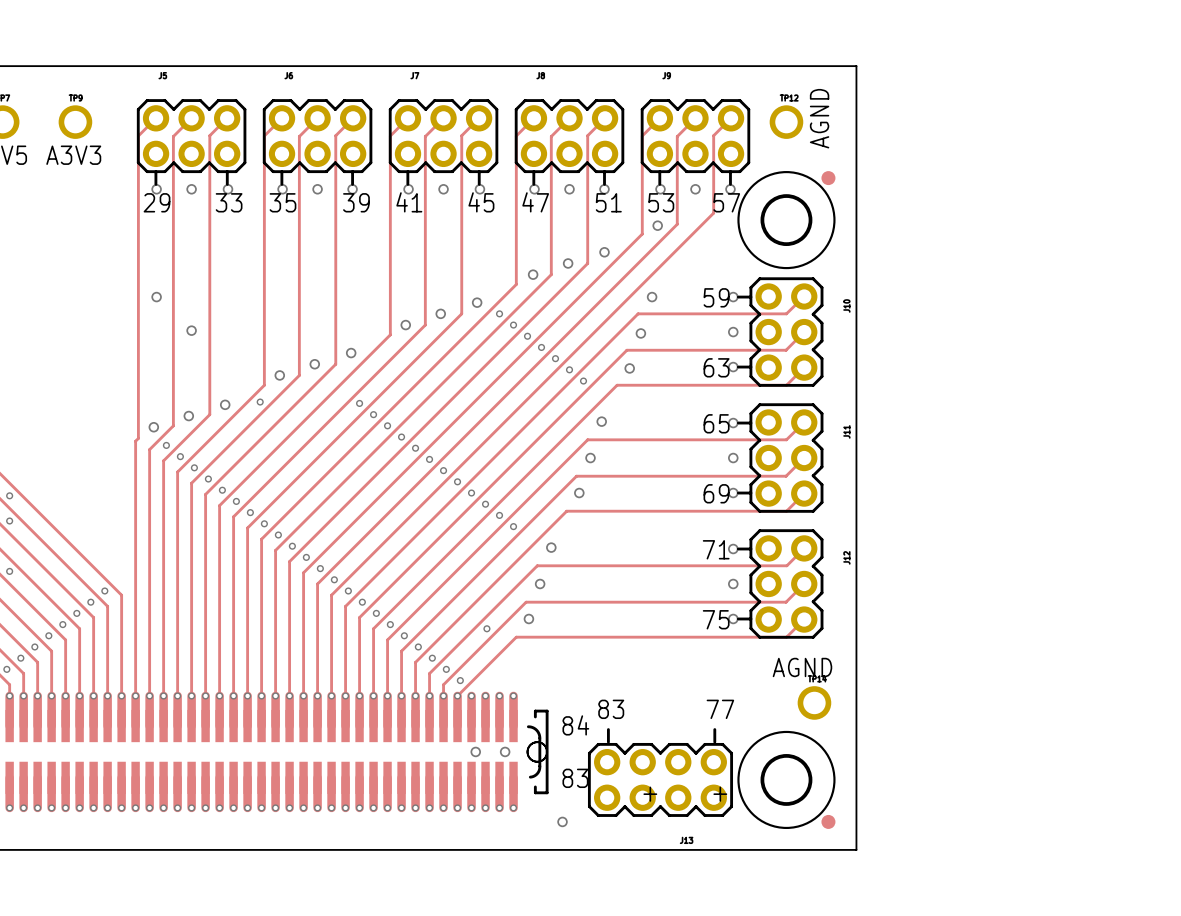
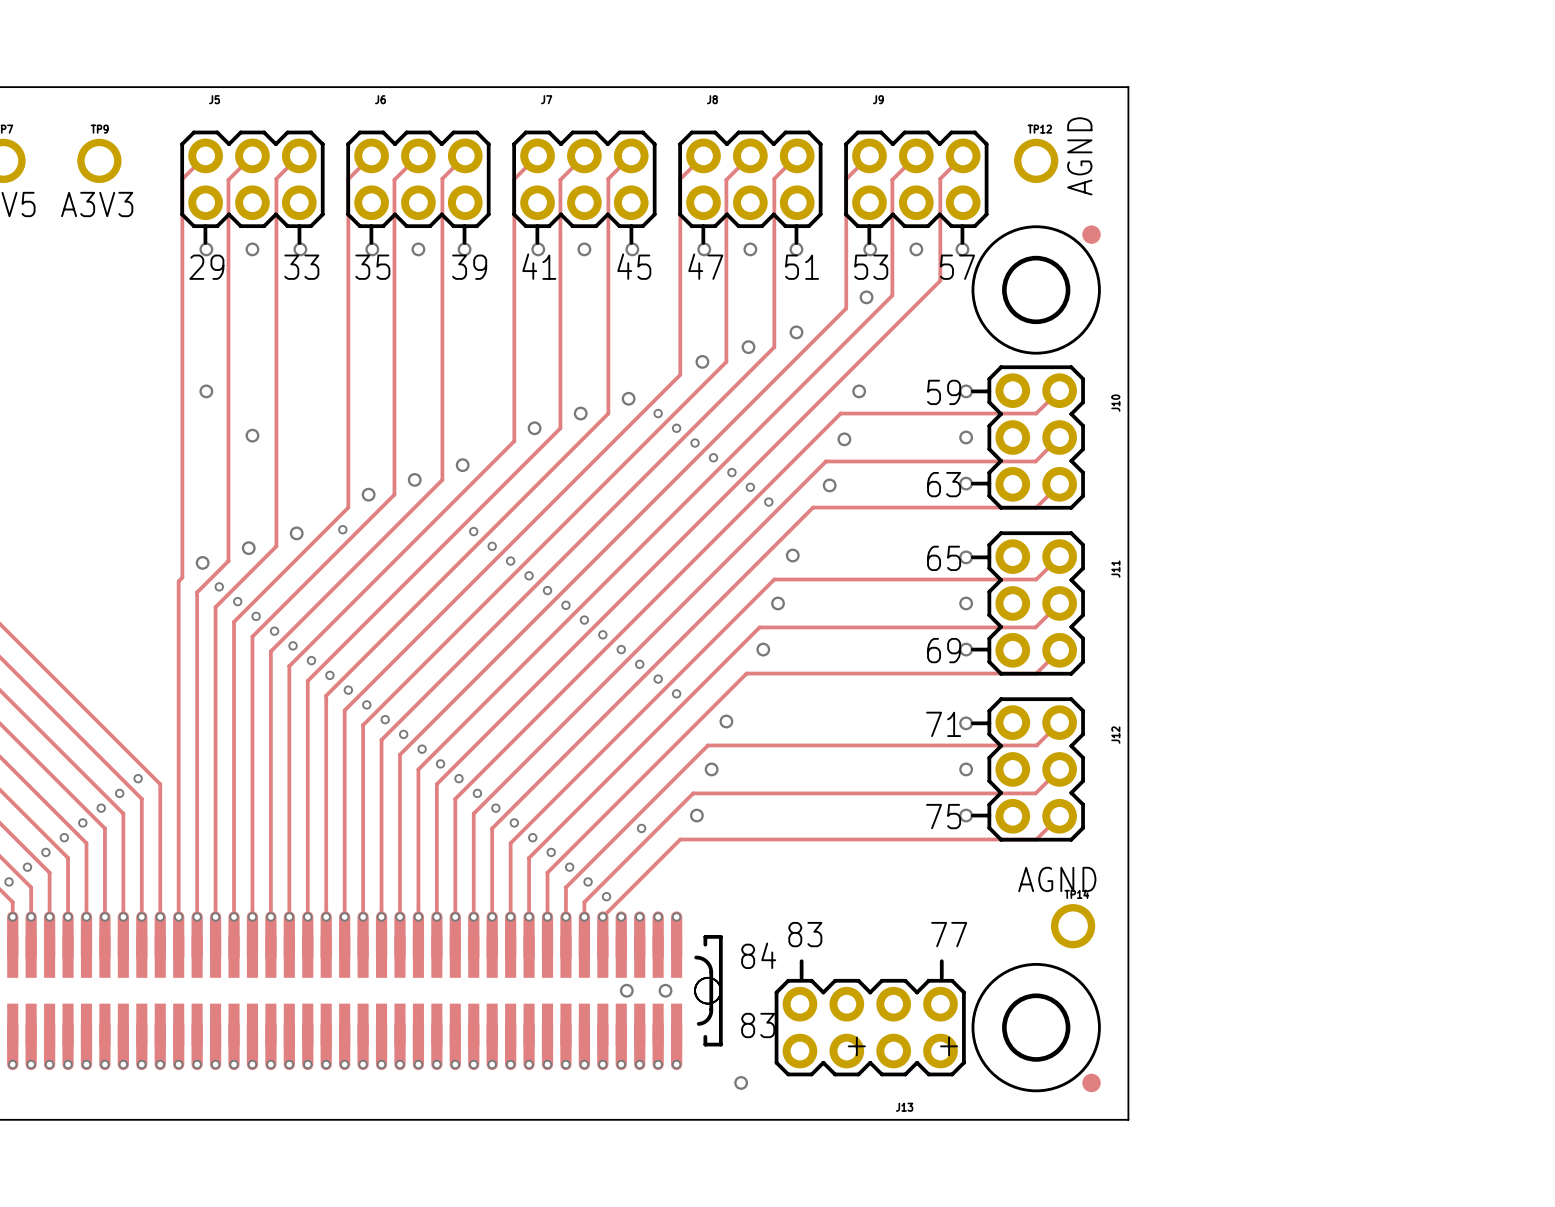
via: (9, 495) -> none
via: (9, 521) -> none
via: (9, 571) -> none

